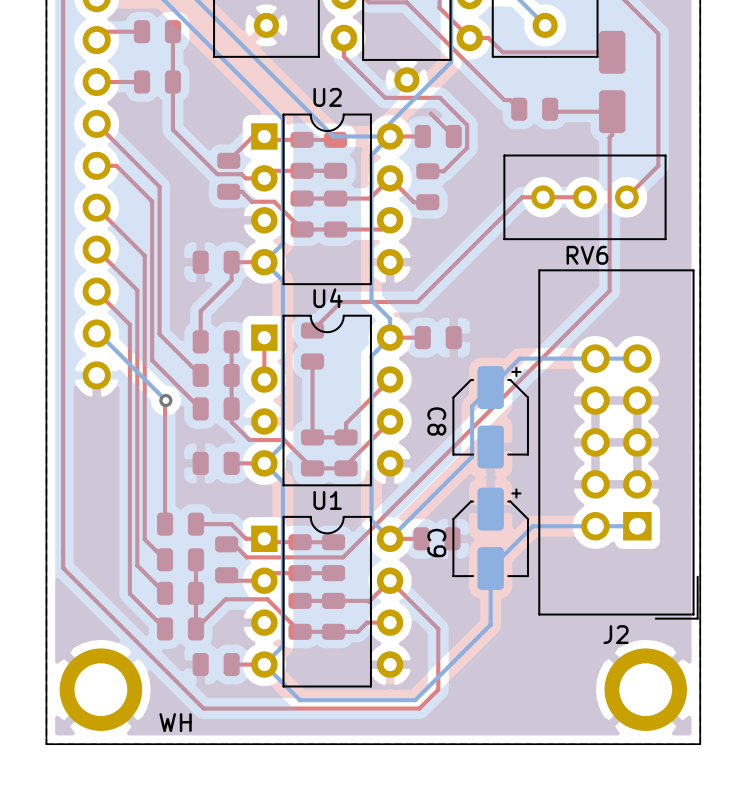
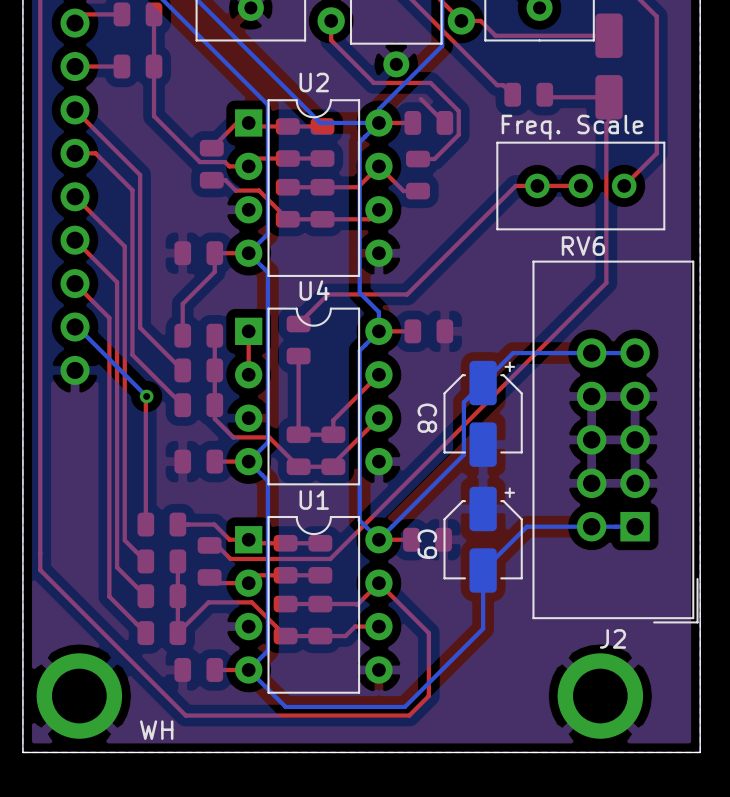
text: none -> Freq. Scale (572, 127)
part position: (645, 689) -> (600, 696)

